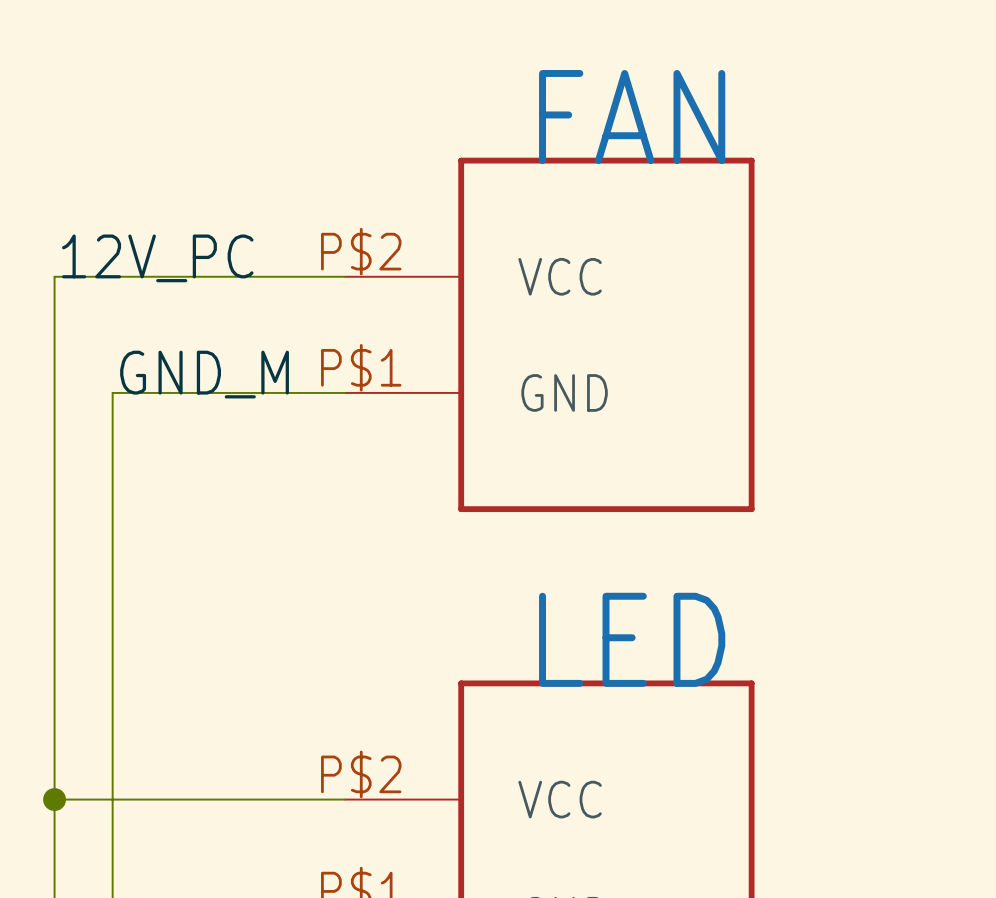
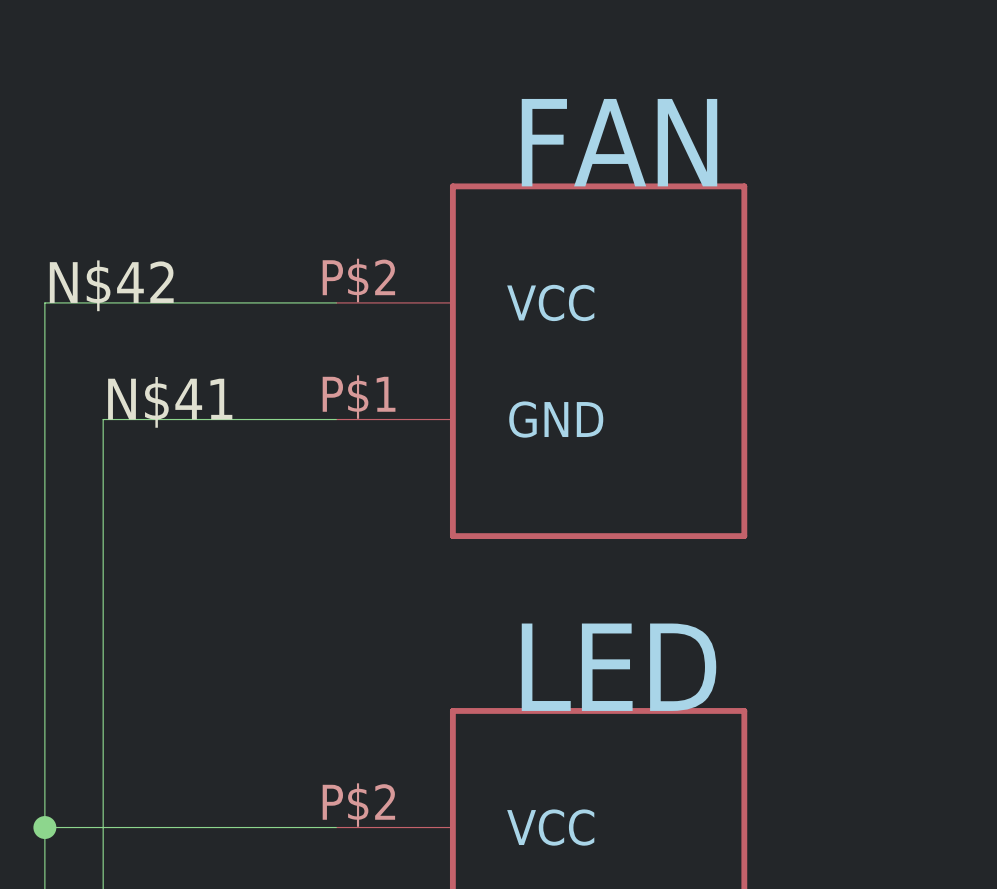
label: 12V_PC (157, 258) -> N$42 (111, 285)
label: GND_M (204, 374) -> N$41 (170, 402)

